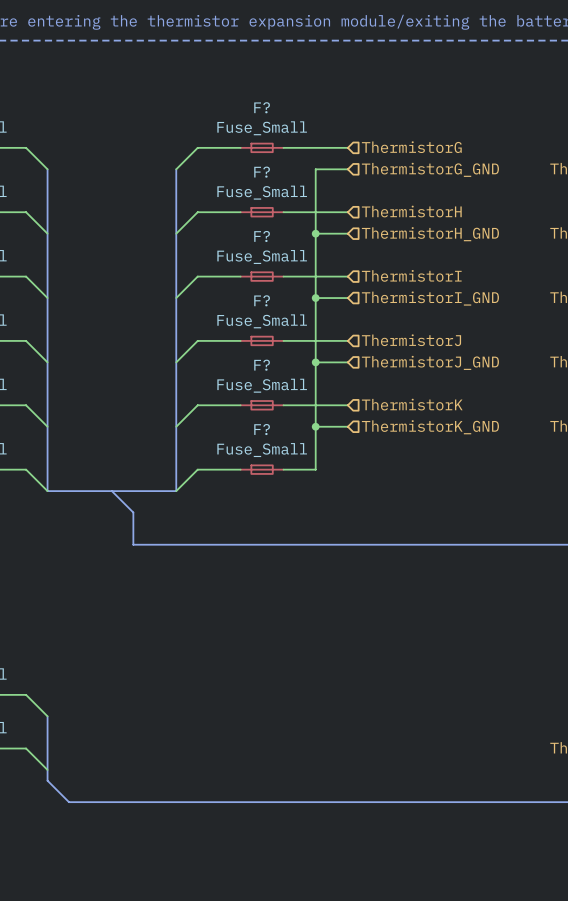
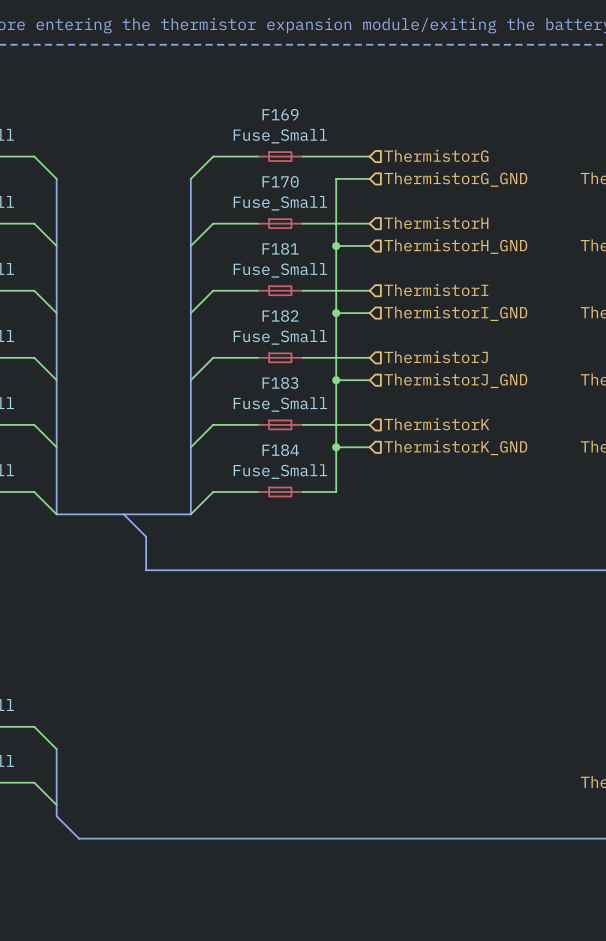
F? name: F? (262, 107) -> F169 (280, 114)
F? name: F? (262, 172) -> F170 (280, 181)
F? name: F? (262, 236) -> F181 (280, 248)
F? name: F? (262, 300) -> F182 (280, 316)
F? name: F? (262, 365) -> F183 (280, 383)
F? name: F? (262, 429) -> F184 (280, 450)

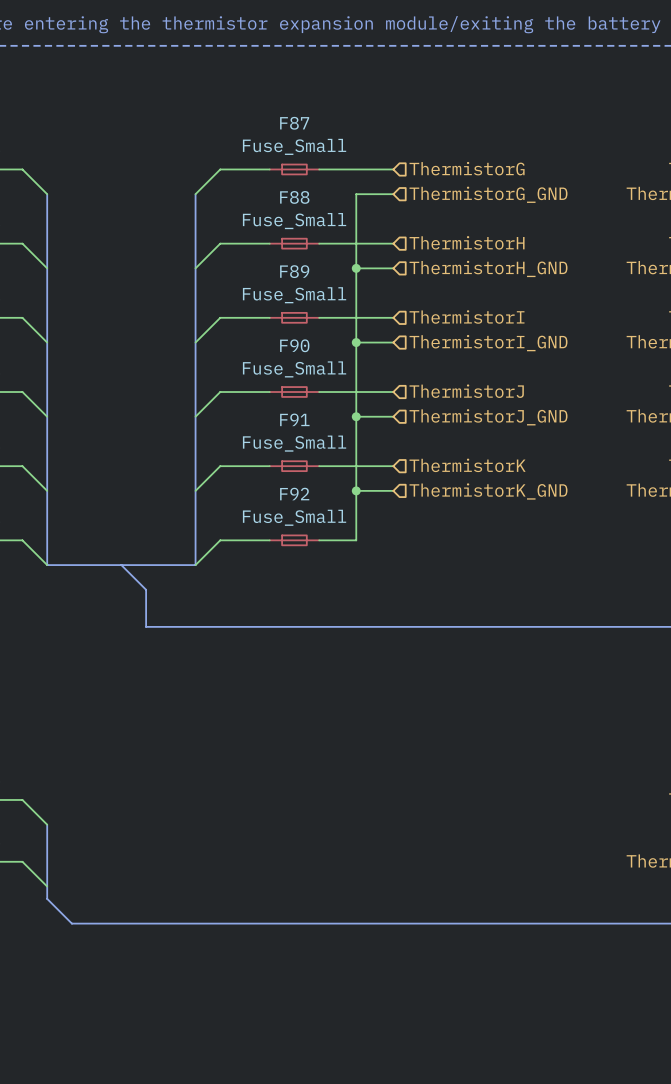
F169 name: F169 (280, 114) -> F87 (294, 123)
F170 name: F170 (280, 181) -> F88 (294, 197)
F181 name: F181 (280, 248) -> F89 (294, 271)
F182 name: F182 (280, 316) -> F90 (294, 345)
F183 name: F183 (280, 383) -> F91 (294, 419)
F184 name: F184 (280, 450) -> F92 (294, 494)

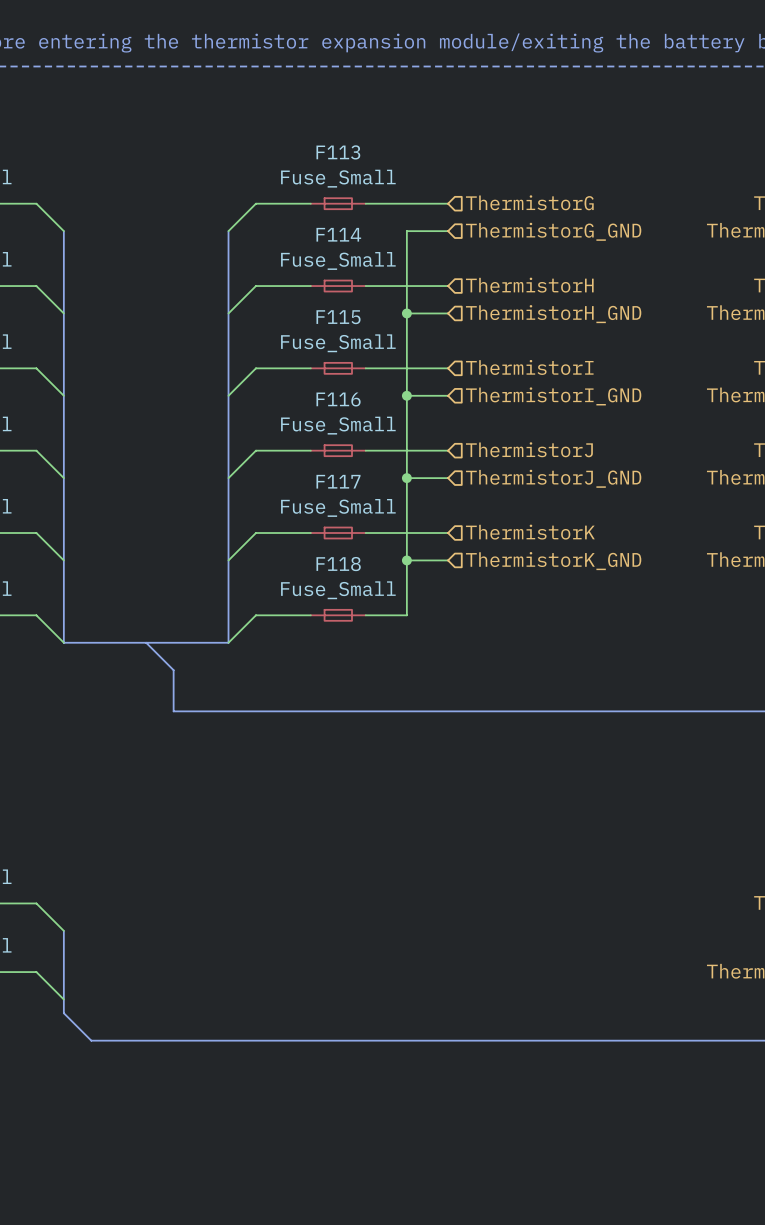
F87 name: F87 (294, 123) -> F113 (338, 152)
F88 name: F88 (294, 197) -> F114 (338, 234)
F89 name: F89 (294, 271) -> F115 (338, 317)
F90 name: F90 (294, 345) -> F116 (338, 399)
F91 name: F91 (294, 419) -> F117 (338, 481)
F92 name: F92 (294, 494) -> F118 (338, 564)

